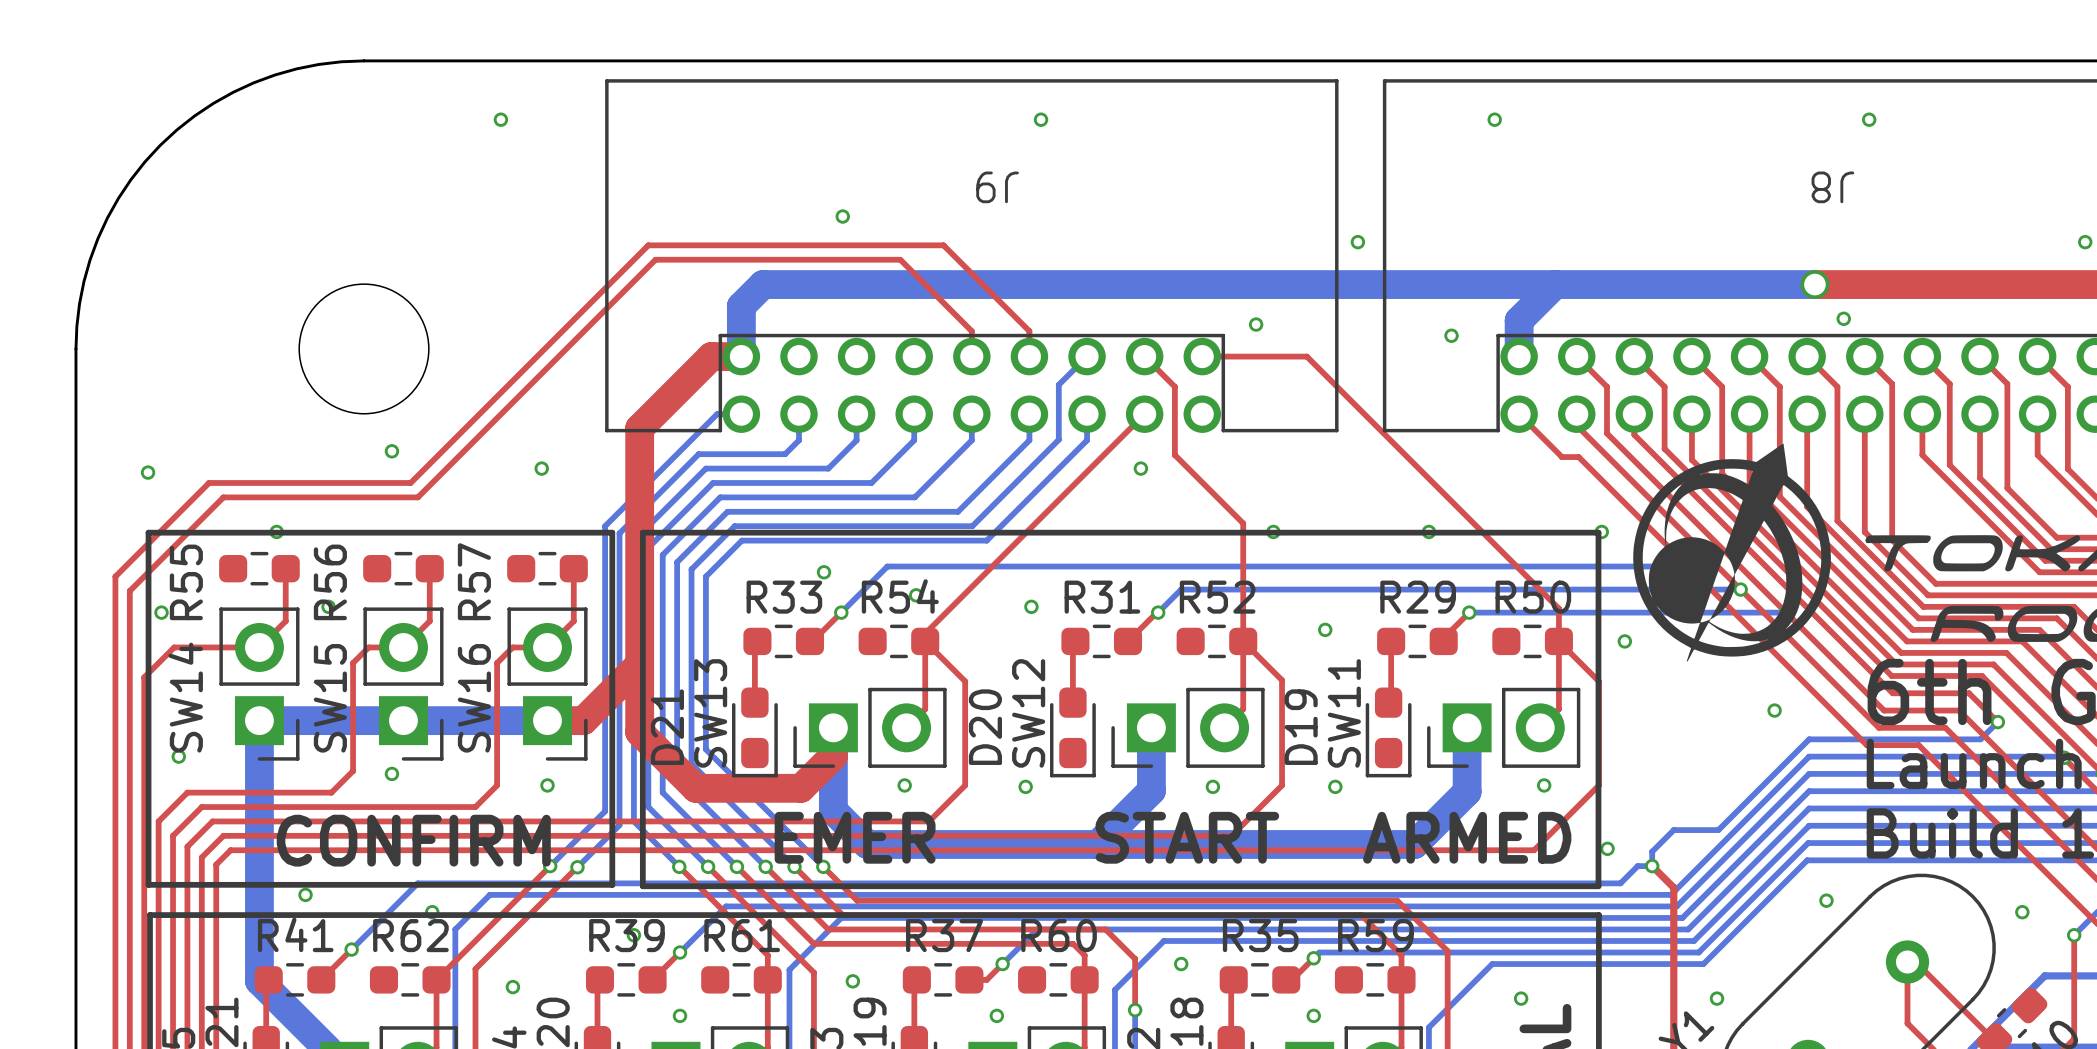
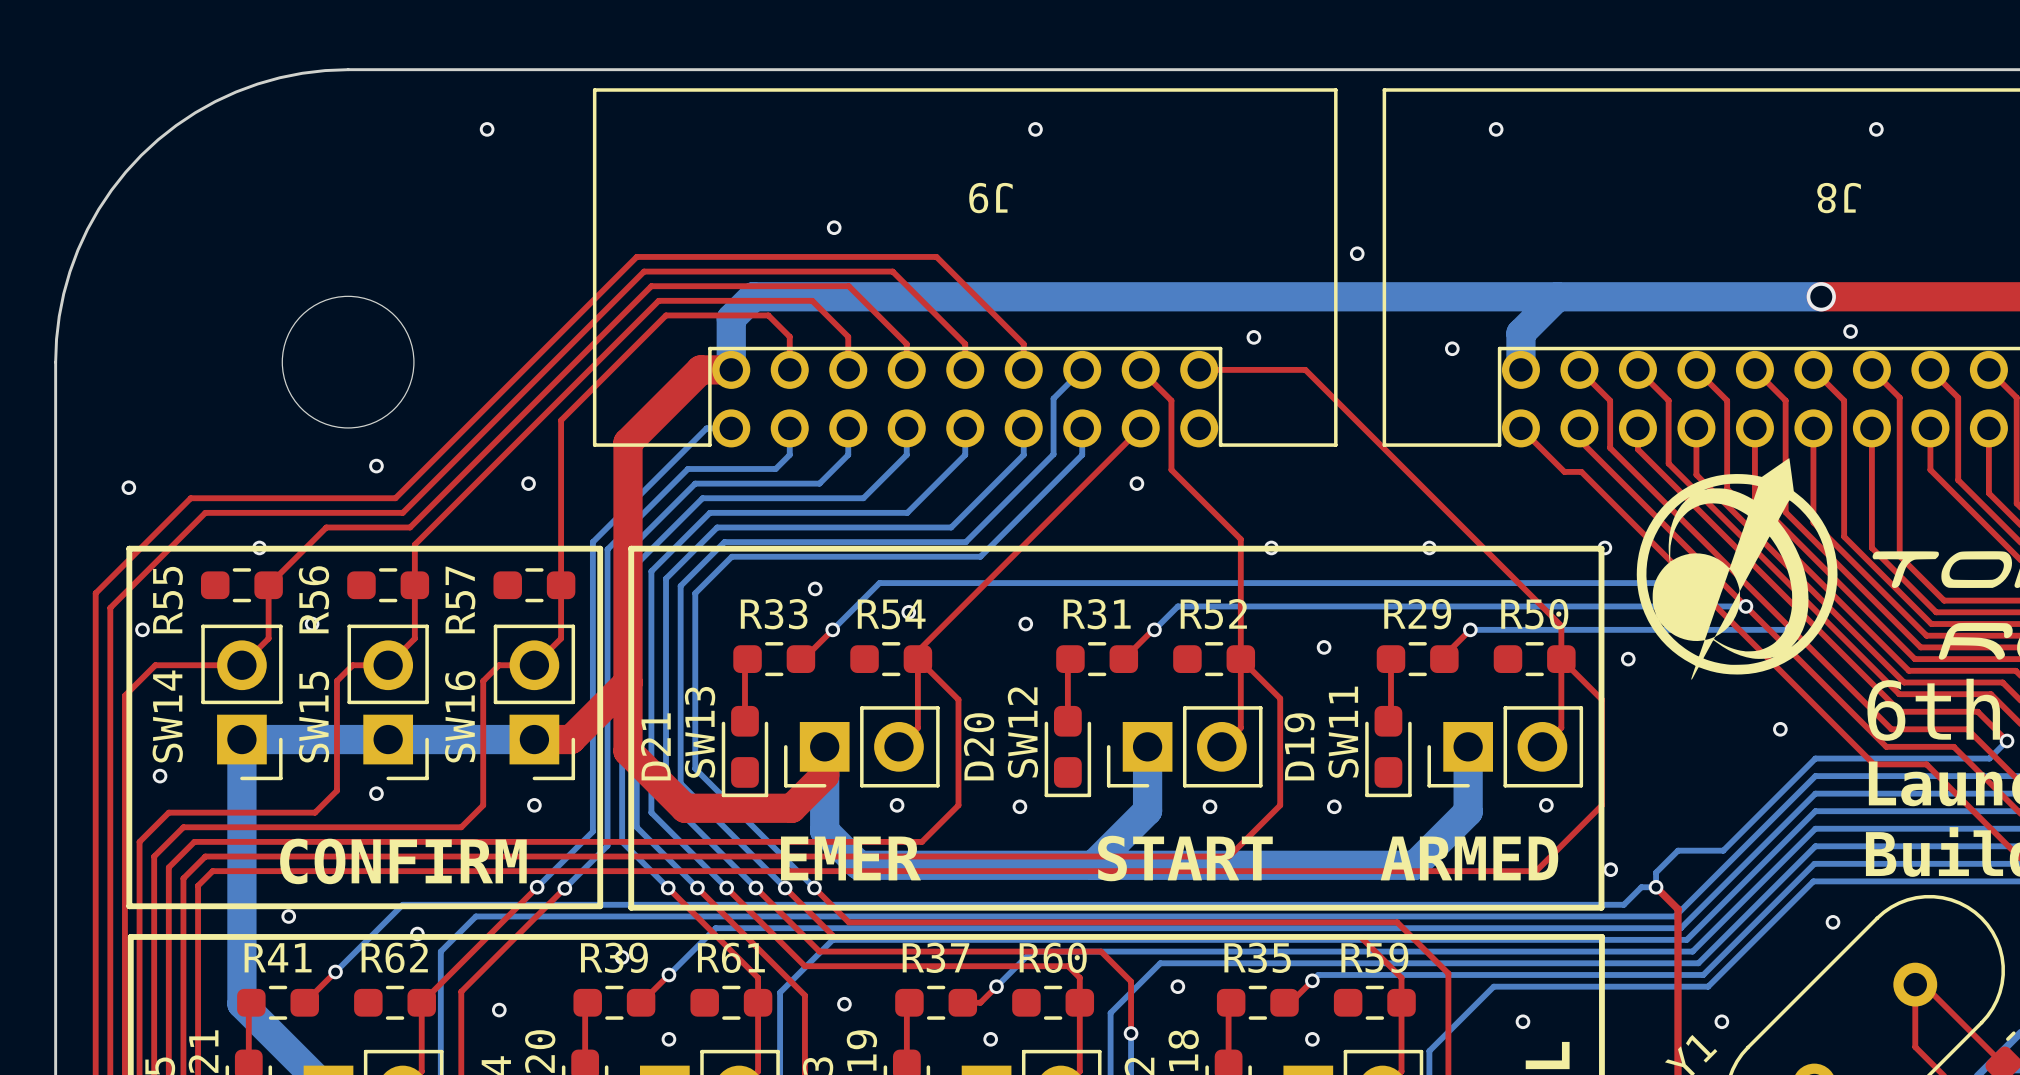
top track: none -> (789, 369) (789, 336) (768, 315) (666, 315) (561, 420) (561, 585)
top track: none -> (848, 369) (848, 336) (812, 300) (658, 300) (414, 544) (414, 585)
top track: none -> (906, 369) (906, 344) (848, 286) (651, 286) (410, 527) (326, 527) (268, 585)

